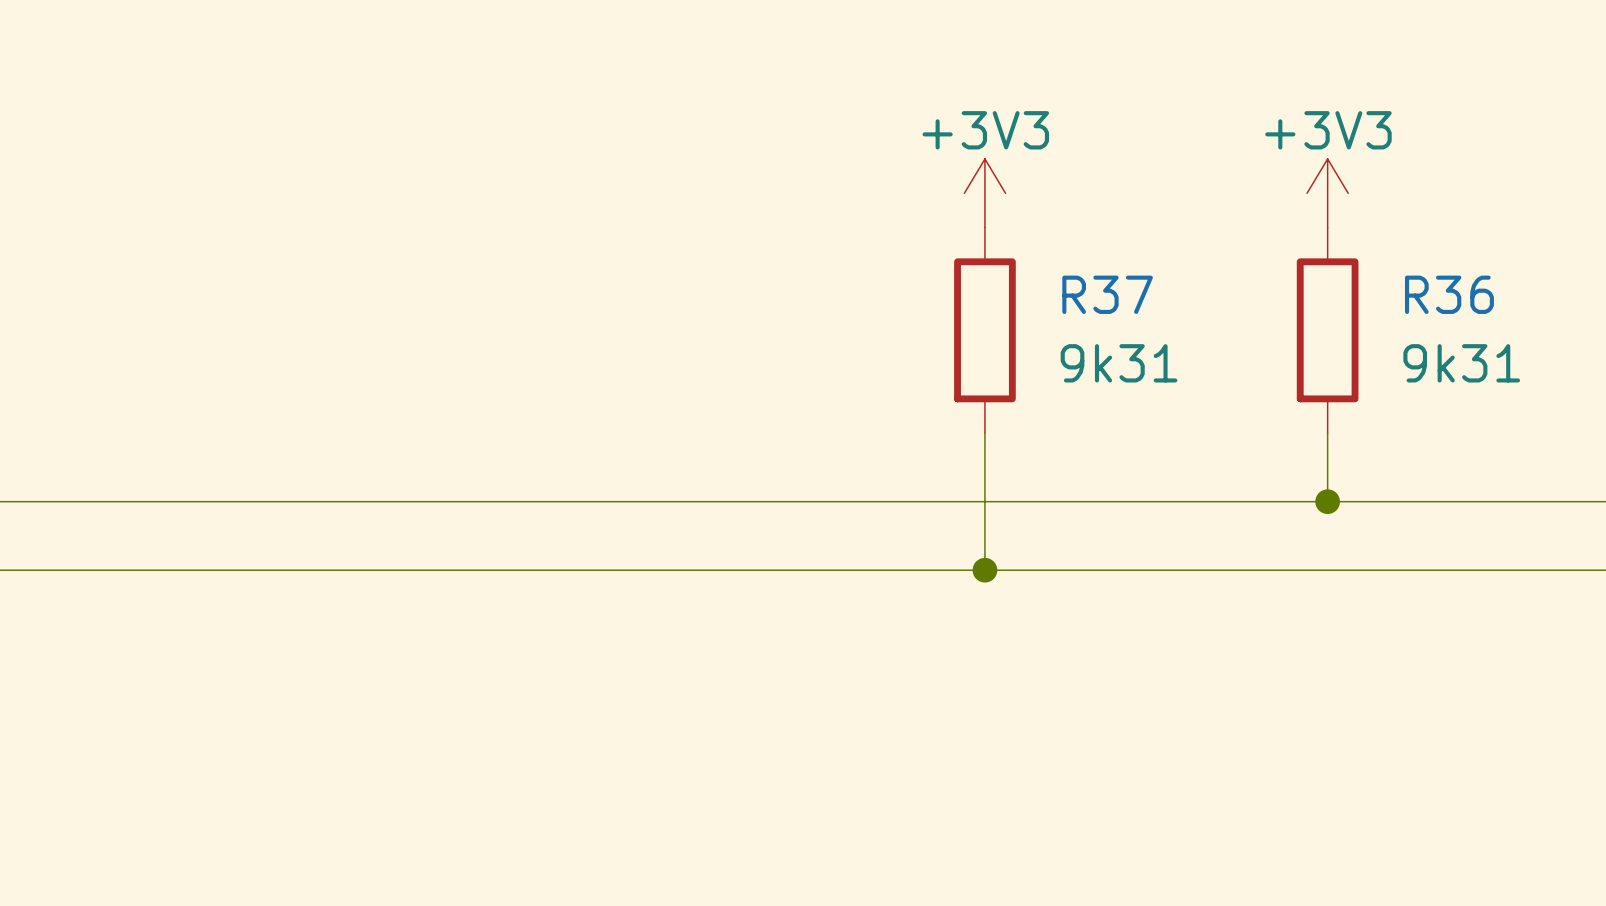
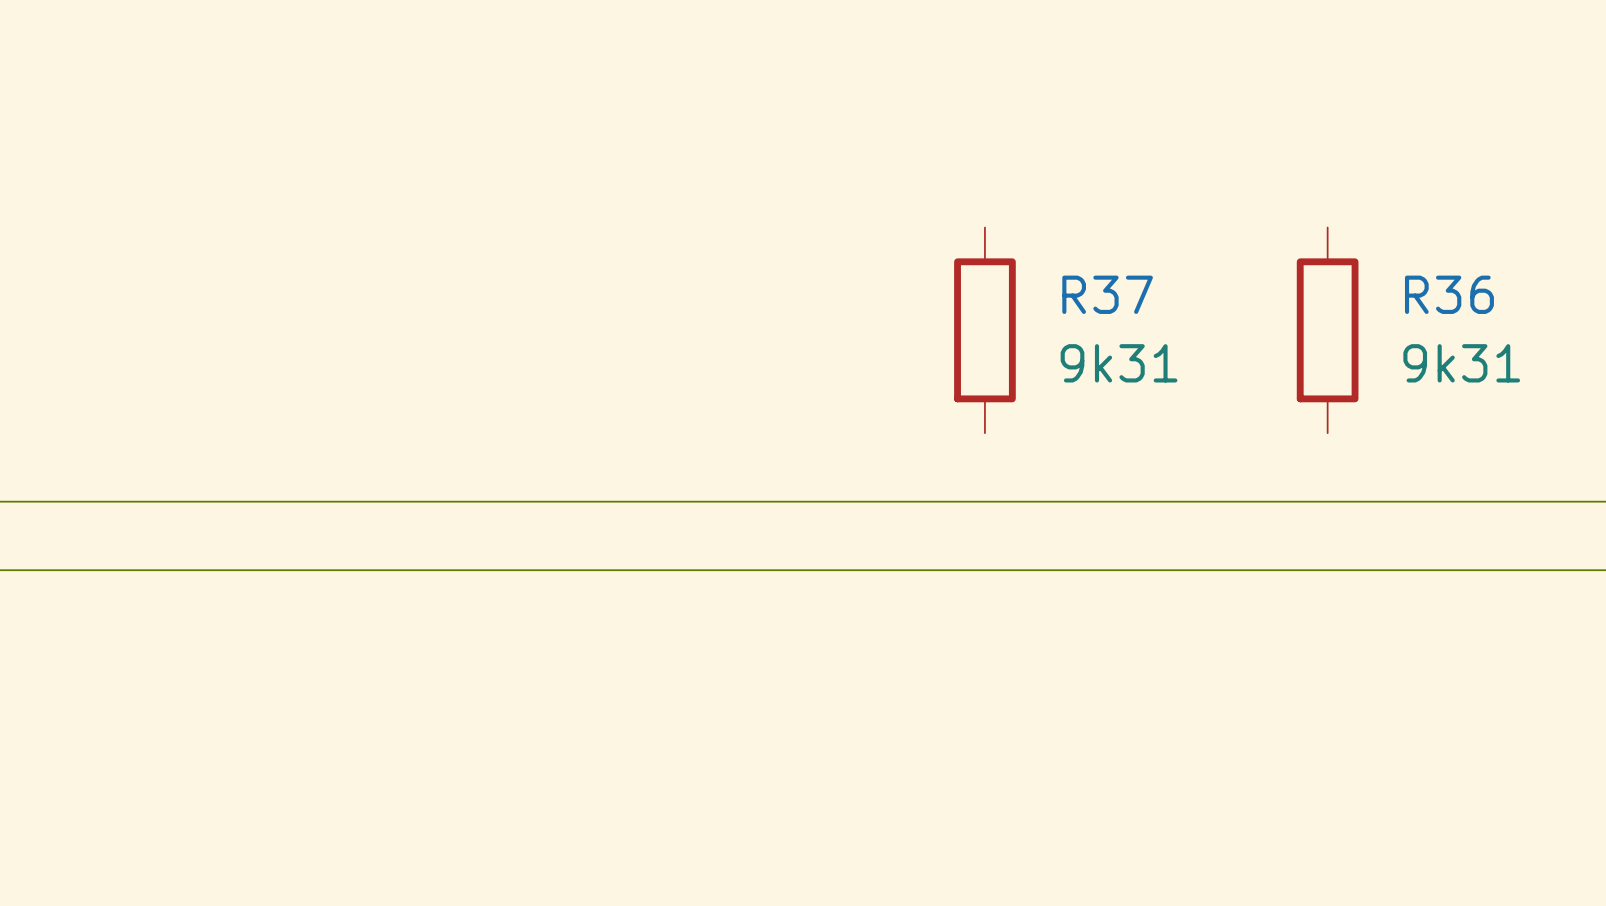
power symbol: +3V3 (984, 193) -> none
power symbol: +3V3 (1327, 193) -> none
wire: (984, 433) (984, 570) -> none
wire: (1327, 433) (1327, 501) -> none
junction: (1327, 501) -> none
junction: (984, 570) -> none

